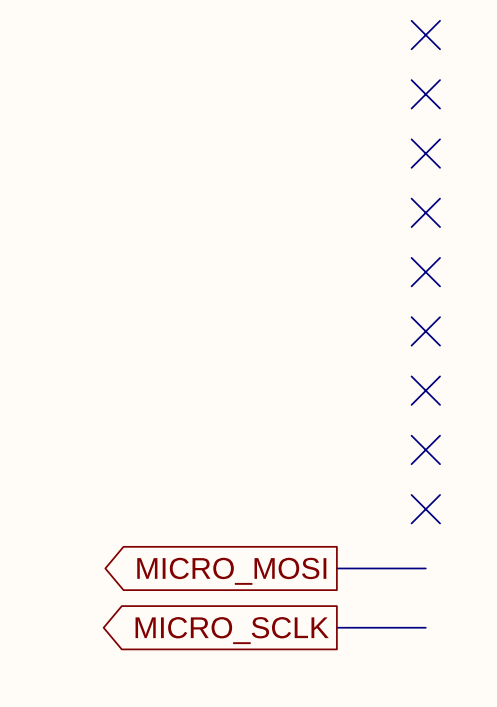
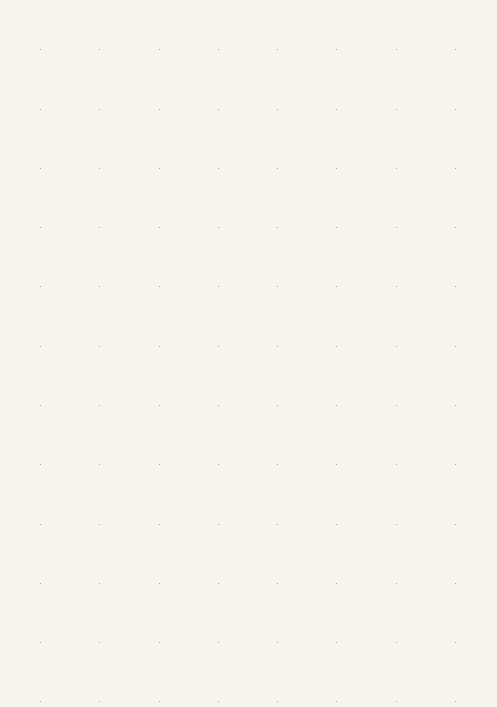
no-connect mark: (425, 35) -> none
no-connect mark: (425, 94) -> none
no-connect mark: (425, 153) -> none
no-connect mark: (425, 212) -> none
no-connect mark: (425, 272) -> none
no-connect mark: (425, 331) -> none
no-connect mark: (425, 390) -> none
no-connect mark: (425, 449) -> none
no-connect mark: (425, 509) -> none
wire: (336, 568) (425, 568) -> none
global label: MICRO_MOSI (231, 571) -> none
wire: (336, 627) (425, 627) -> none
global label: MICRO_SCLK (232, 630) -> none

